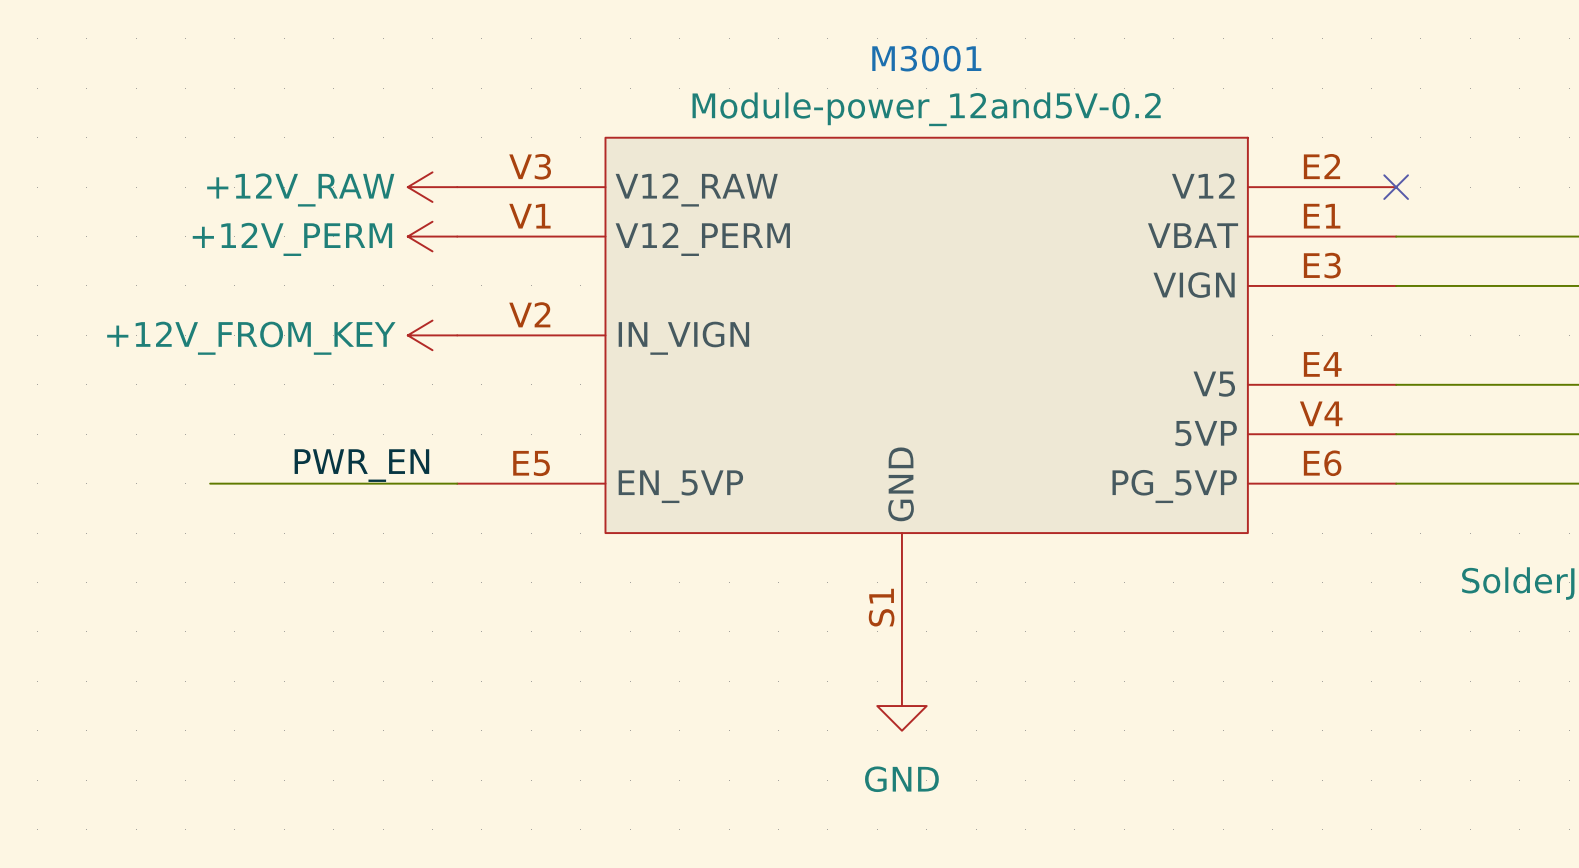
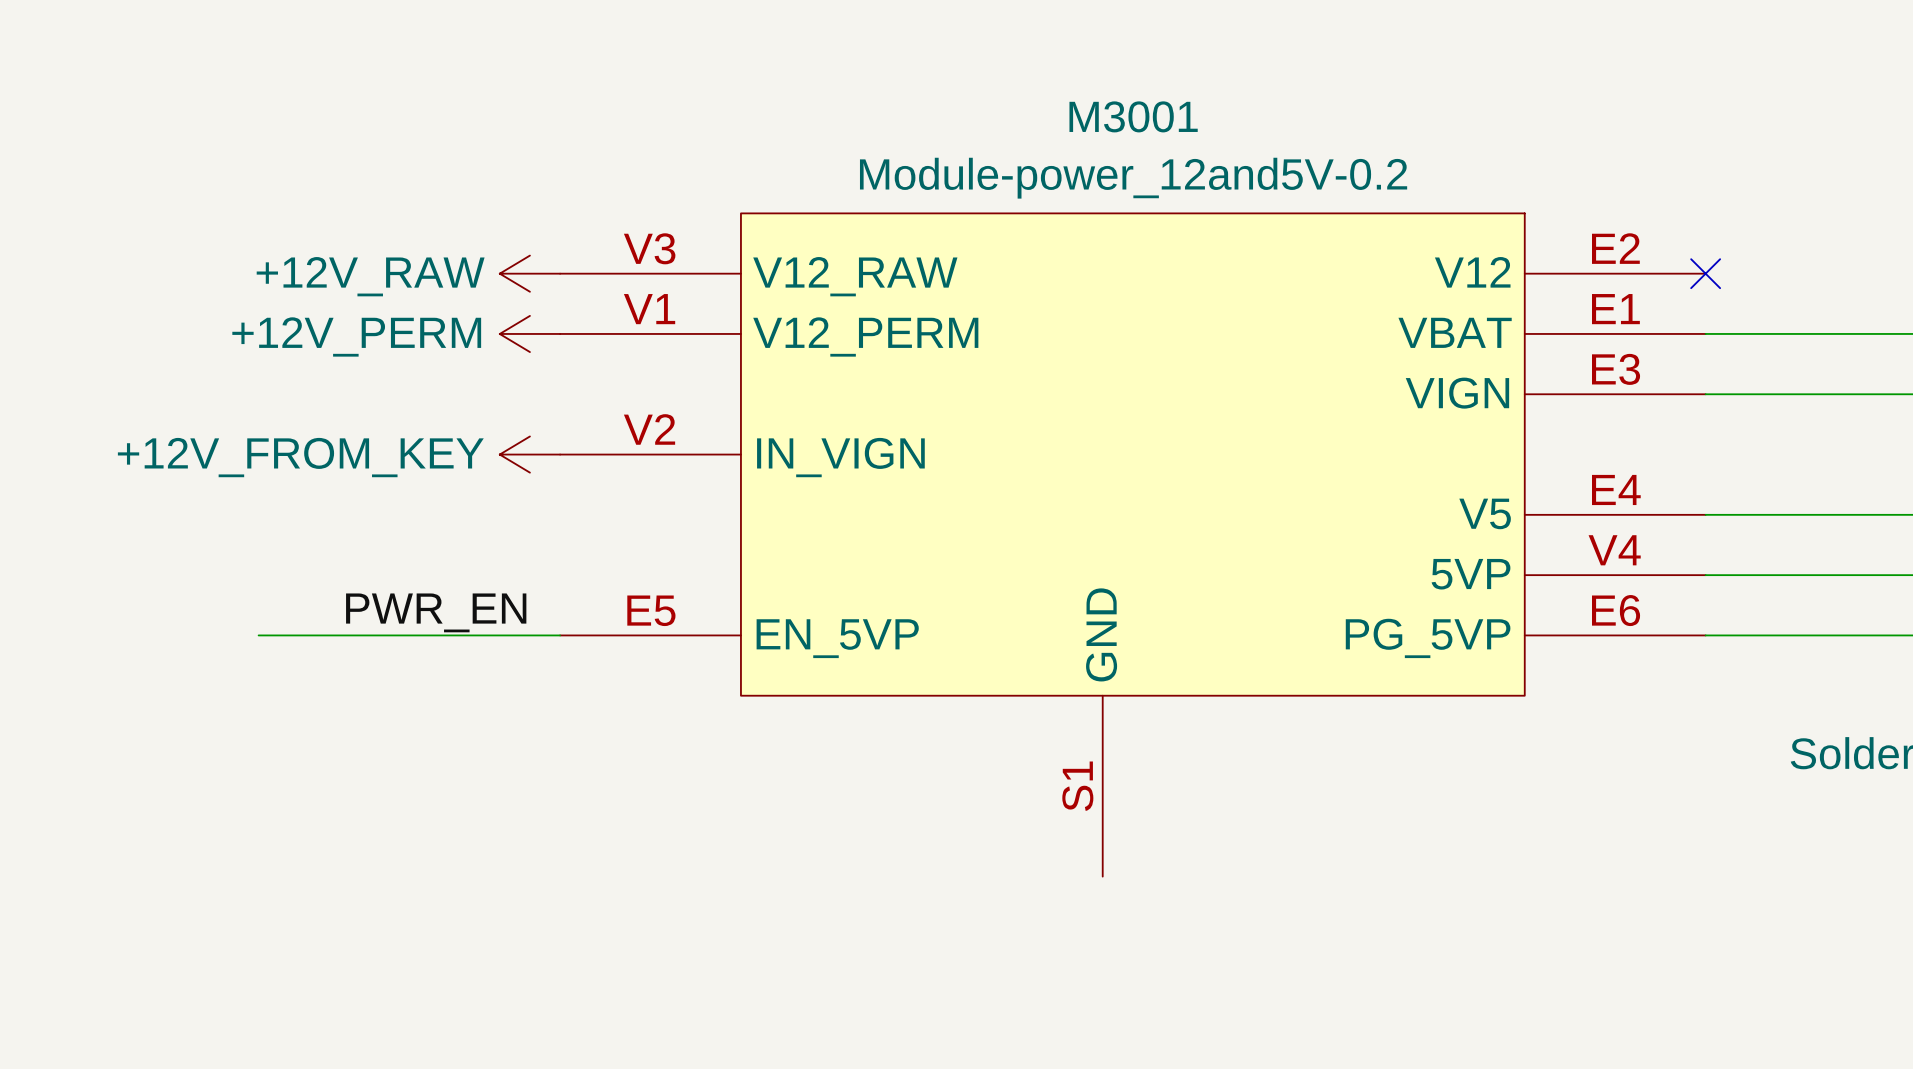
power symbol: GND (901, 706) -> none

